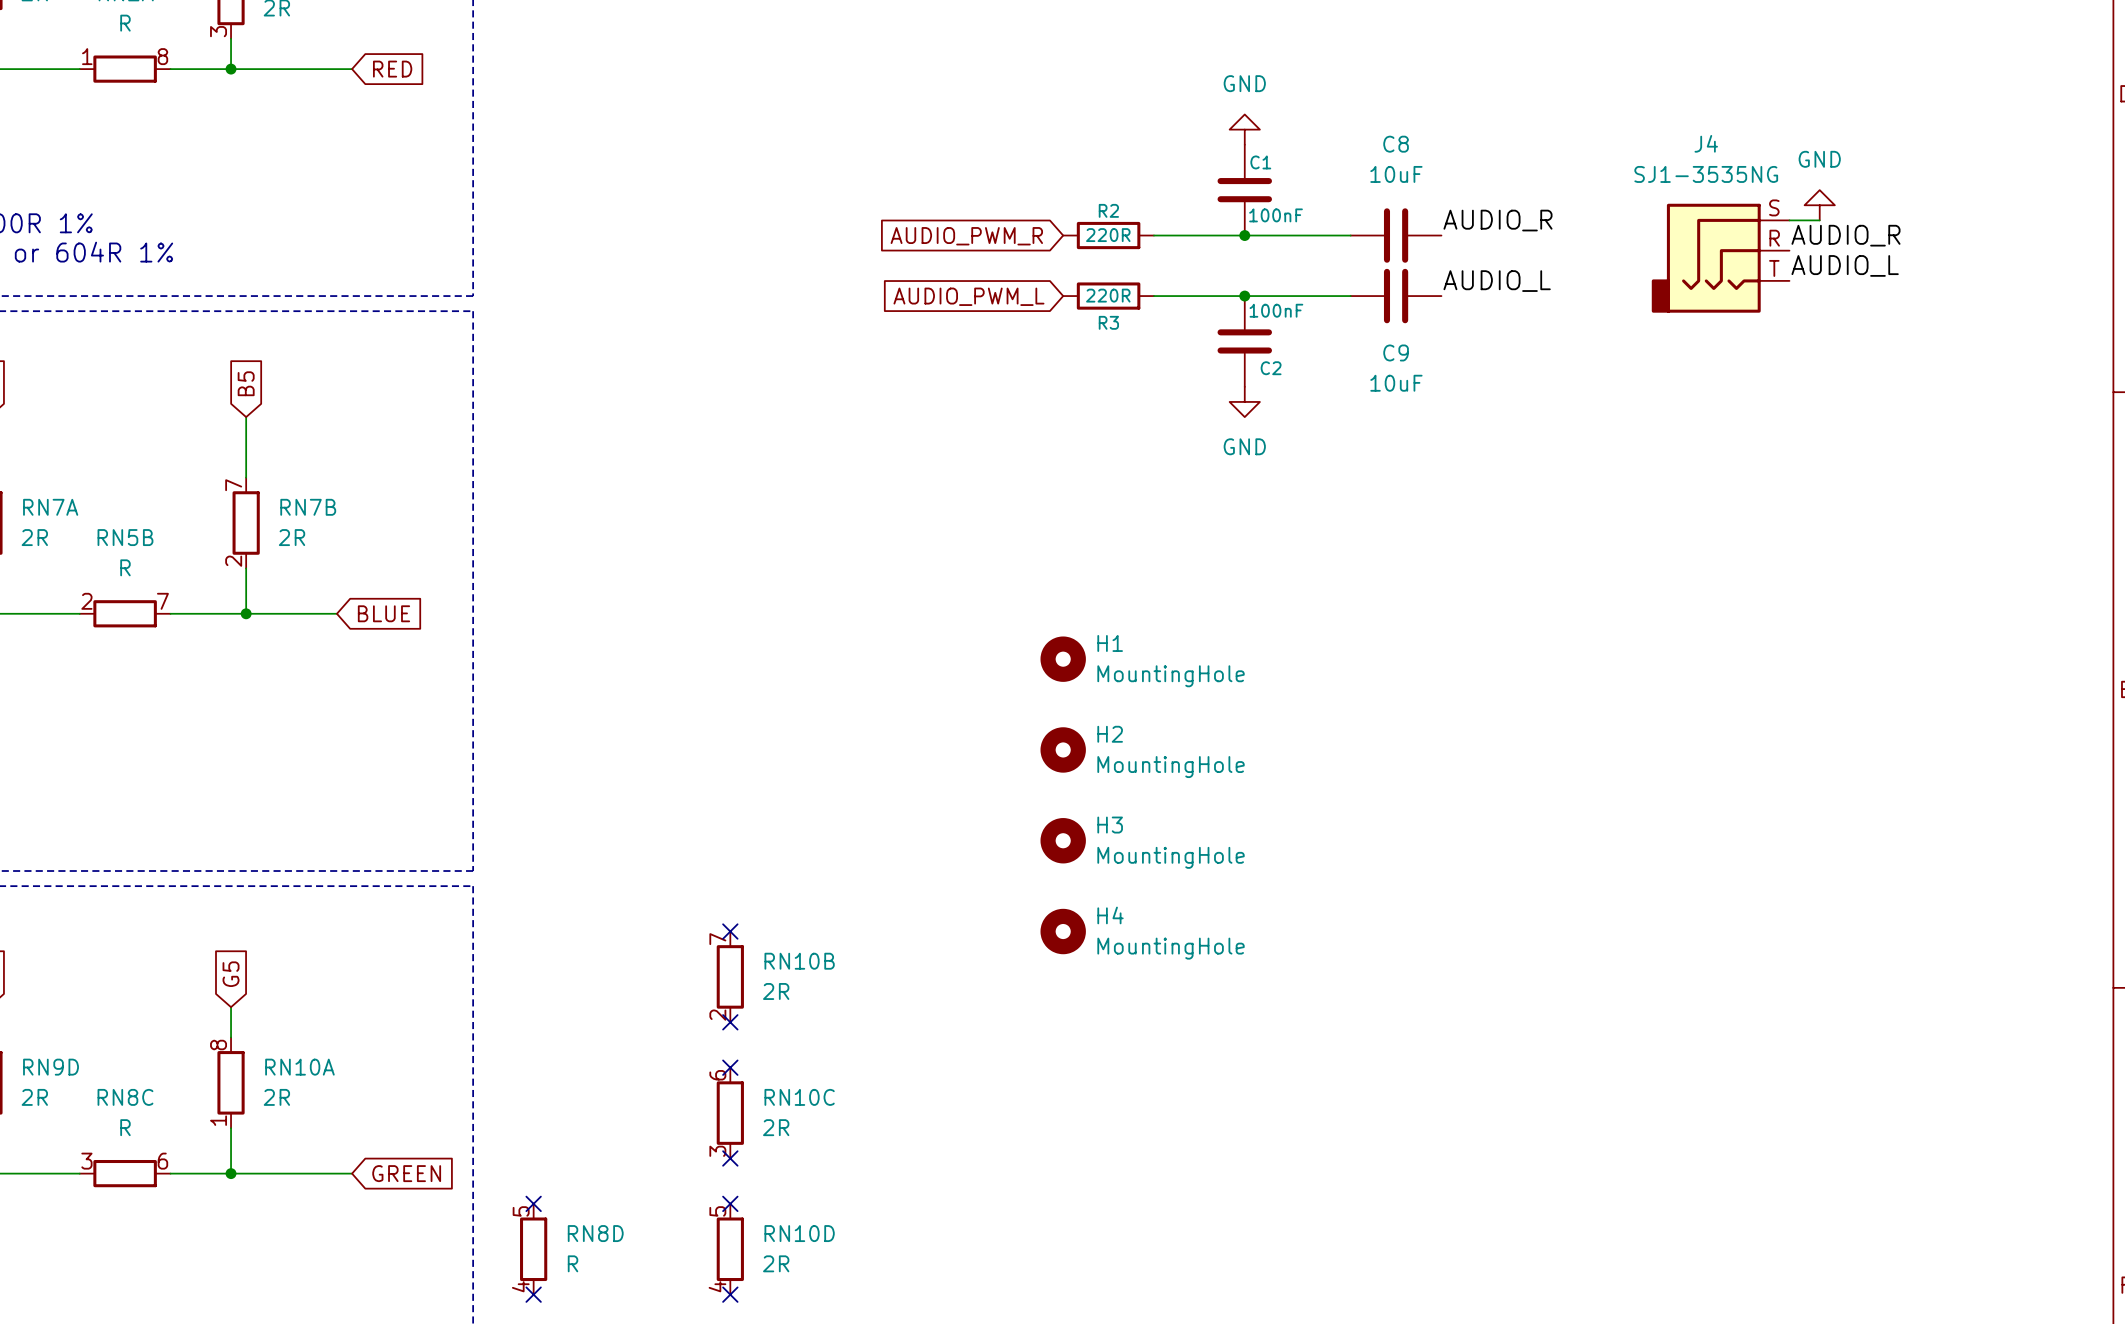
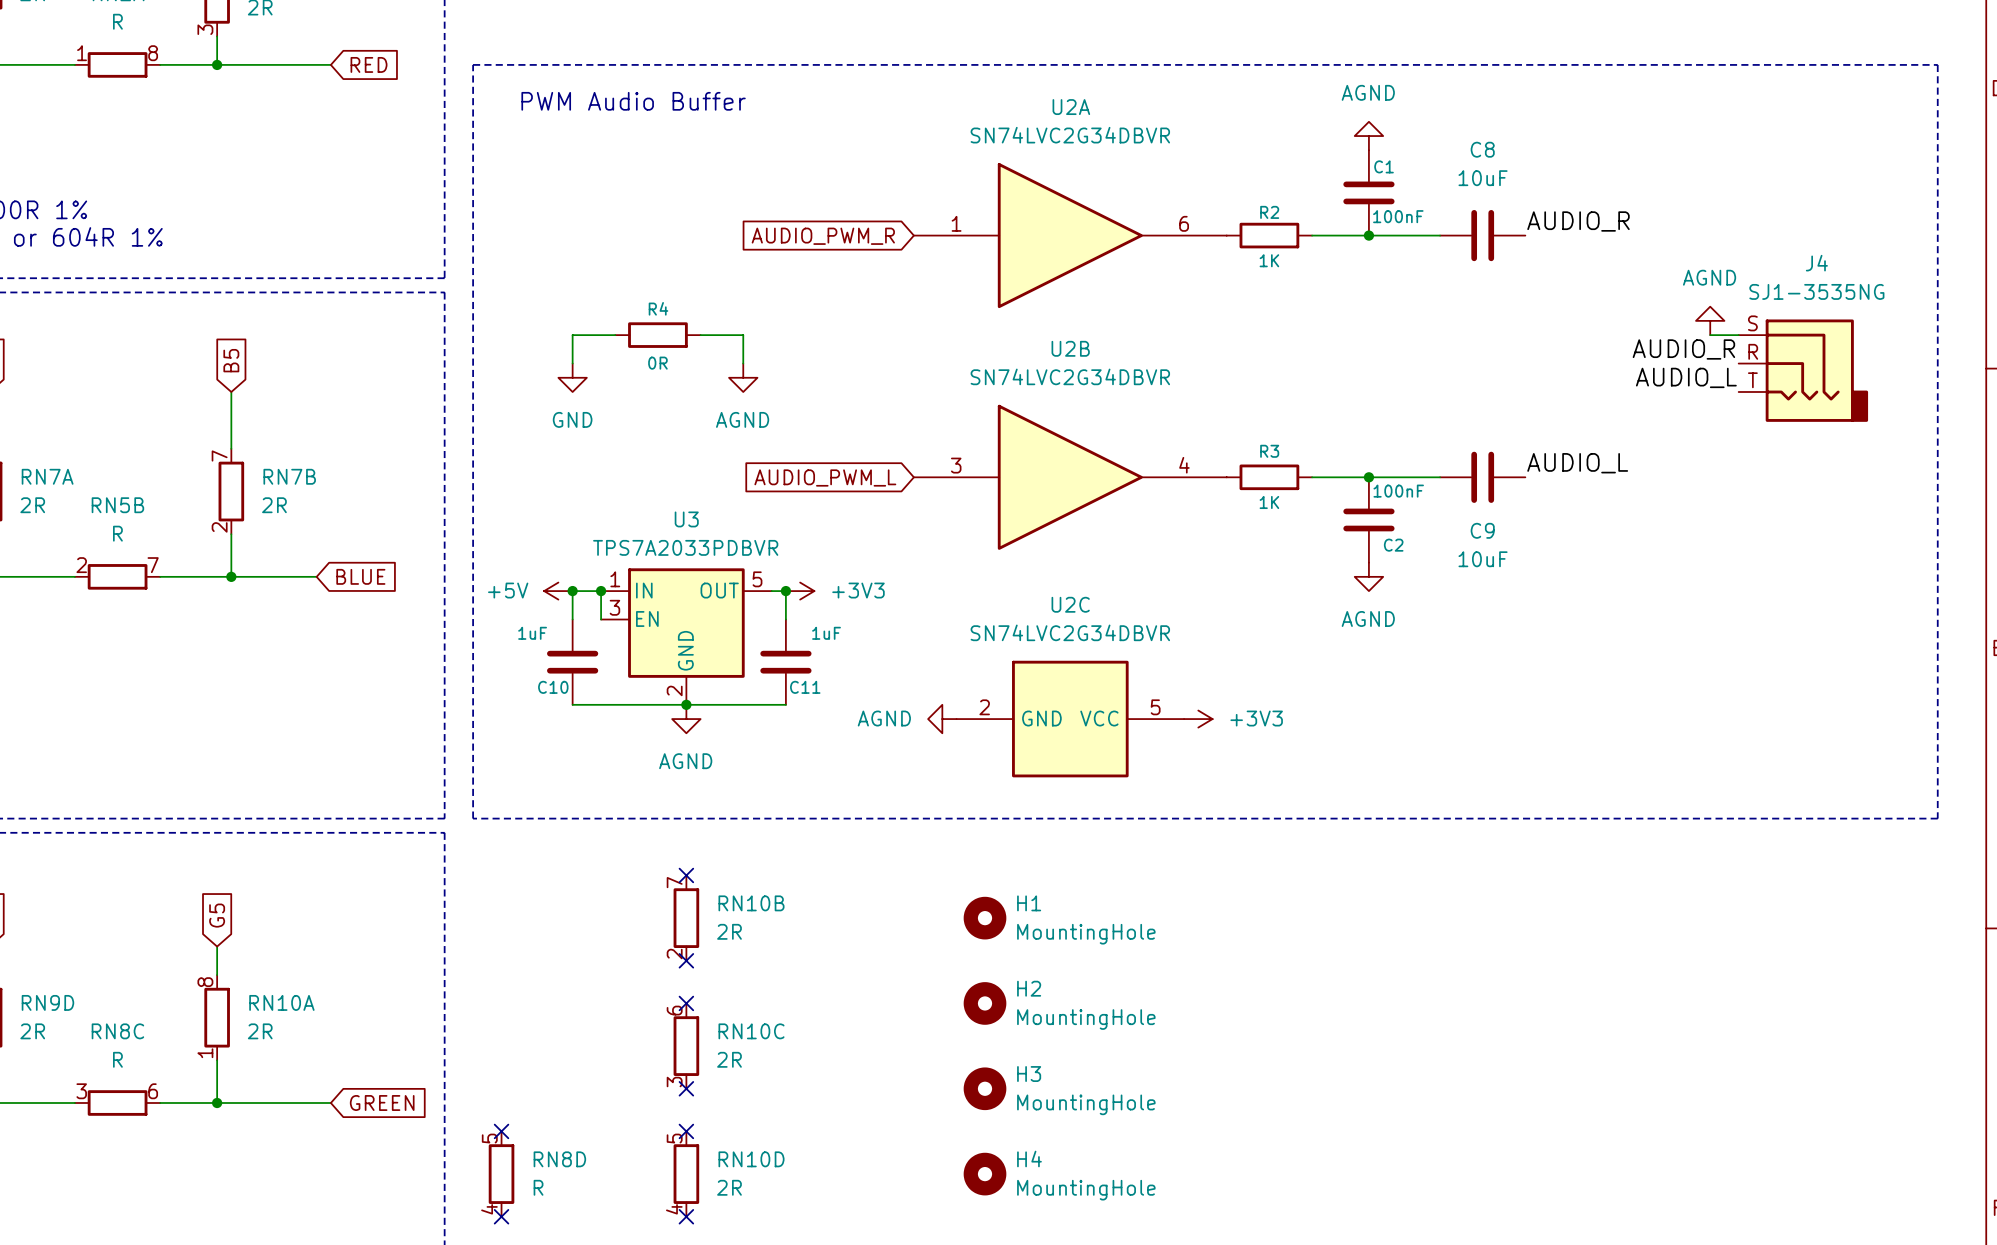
line: none -> (473, 64) (1937, 64) (1937, 818) (473, 818) (473, 64)
text: none -> PWM Audio Buffer (633, 101)
power symbol: GND (1244, 129) -> none
power symbol: none -> AGND (1368, 136)
C1 position: (1244, 190) -> (1368, 192)
power symbol: GND (1819, 205) -> none
label: AUDIO_R (1497, 220) -> none
wire: (1789, 220) (1819, 220) -> (1710, 335) (1738, 335)
R2 position: (1108, 235) -> (1269, 235)
R2 value: 220R (1108, 235) -> 1K (1269, 260)
wire: (1153, 235) (1350, 235) -> none
junction: (1244, 235) -> none
C8 position: (1396, 235) -> (1482, 235)
label: none -> AUDIO_R (1578, 221)
label: AUDIO_R (1845, 235) -> none
global label position: AUDIO_PWM_R (966, 236) -> AUDIO_PWM_R (823, 236)
U2A: none -> SN74LVC2G34DBVR (1070, 235)
wire: none -> (1312, 235) (1440, 235)
junction: none -> (1368, 235)
J4 flip: as is (1706, 258) -> left-right (1816, 370)
J4 position: (1720, 258) -> (1803, 370)
label: AUDIO_L (1845, 265) -> none
label: AUDIO_L (1497, 281) -> none
R3 value: 220R (1108, 295) -> 1K (1269, 502)
global label position: AUDIO_PWM_L (968, 296) -> AUDIO_PWM_L (825, 477)
R3 position: (1108, 296) -> (1269, 477)
wire: (1153, 296) (1350, 296) -> none
junction: (1244, 296) -> none
C9 position: (1396, 296) -> (1482, 477)
R3 name position: R3 (1108, 322) -> R3 (1269, 451)
C2 position: (1244, 341) -> (1368, 519)
power symbol: none -> AGND (1710, 320)
wire: none -> (615, 335) (572, 335) (572, 363)
R4: none -> 0R (657, 335)
wire: none -> (700, 335) (743, 335) (743, 363)
label: none -> AUDIO_R (1683, 349)
power symbol: none -> GND (572, 377)
power symbol: none -> AGND (743, 377)
power symbol: GND (1244, 401) -> none
label: none -> AUDIO_L (1686, 377)
label: none -> AUDIO_L (1577, 463)
U2B: none -> SN74LVC2G34DBVR (1070, 477)
wire: none -> (1312, 477) (1440, 477)
junction: none -> (1368, 477)
power symbol: none -> AGND (1368, 576)
power symbol: none -> +5V (558, 591)
junction: none -> (572, 591)
junction: none -> (601, 591)
wire: none -> (771, 591) (785, 591) (785, 619)
junction: none -> (785, 591)
power symbol: none -> +3V3 (800, 591)
wire: none -> (572, 619) (572, 591) (601, 591) (601, 619)
H1 position: (1063, 659) -> (985, 918)
U3: none -> TPS7A2033PDBVR (686, 636)
C10: none -> 1uF (572, 662)
C11: none -> 1uF (785, 662)
wire: none -> (572, 704) (785, 704)
junction: none -> (686, 704)
H2 position: (1063, 749) -> (985, 1003)
power symbol: none -> AGND (686, 719)
power symbol: none -> AGND (942, 719)
U2C: none -> SN74LVC2G34DBVR (1070, 719)
power symbol: none -> +3V3 (1198, 719)
H3 position: (1063, 840) -> (985, 1088)
H4 position: (1063, 931) -> (985, 1174)

